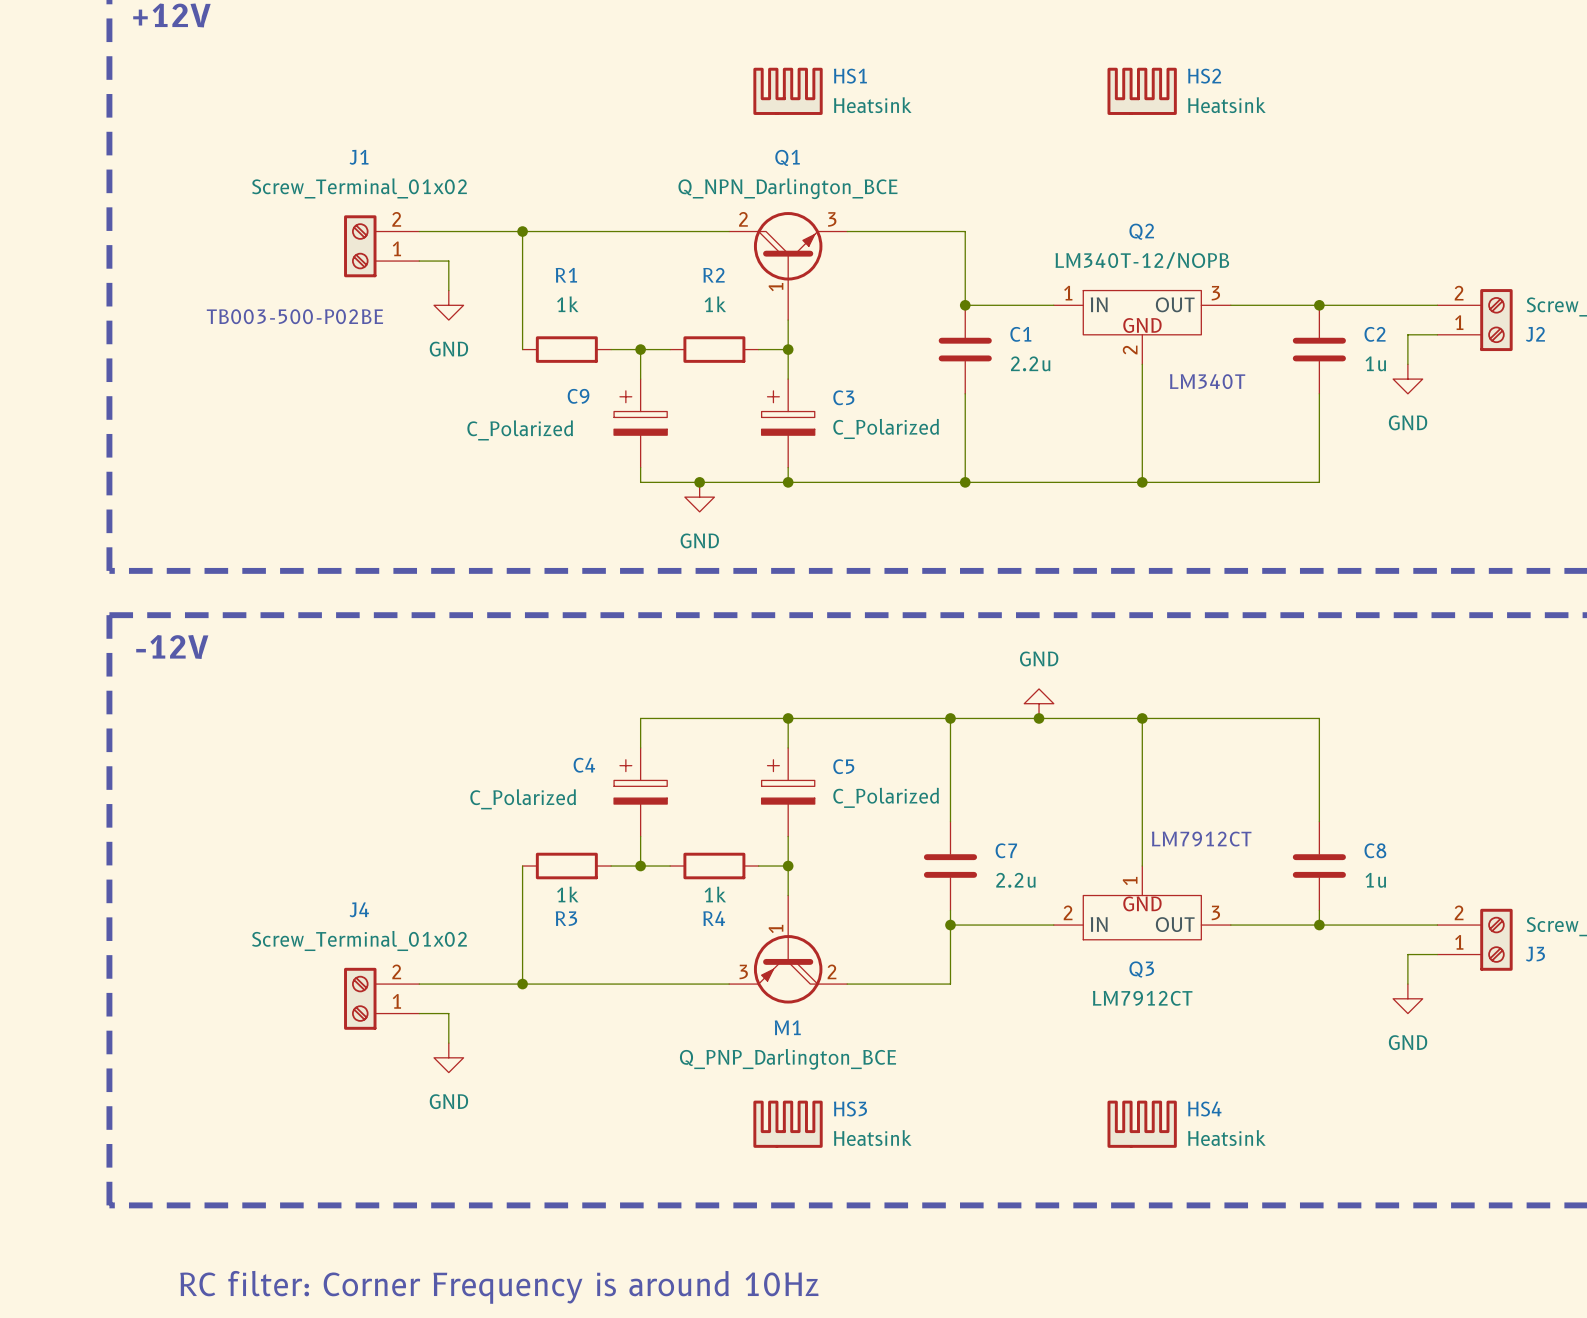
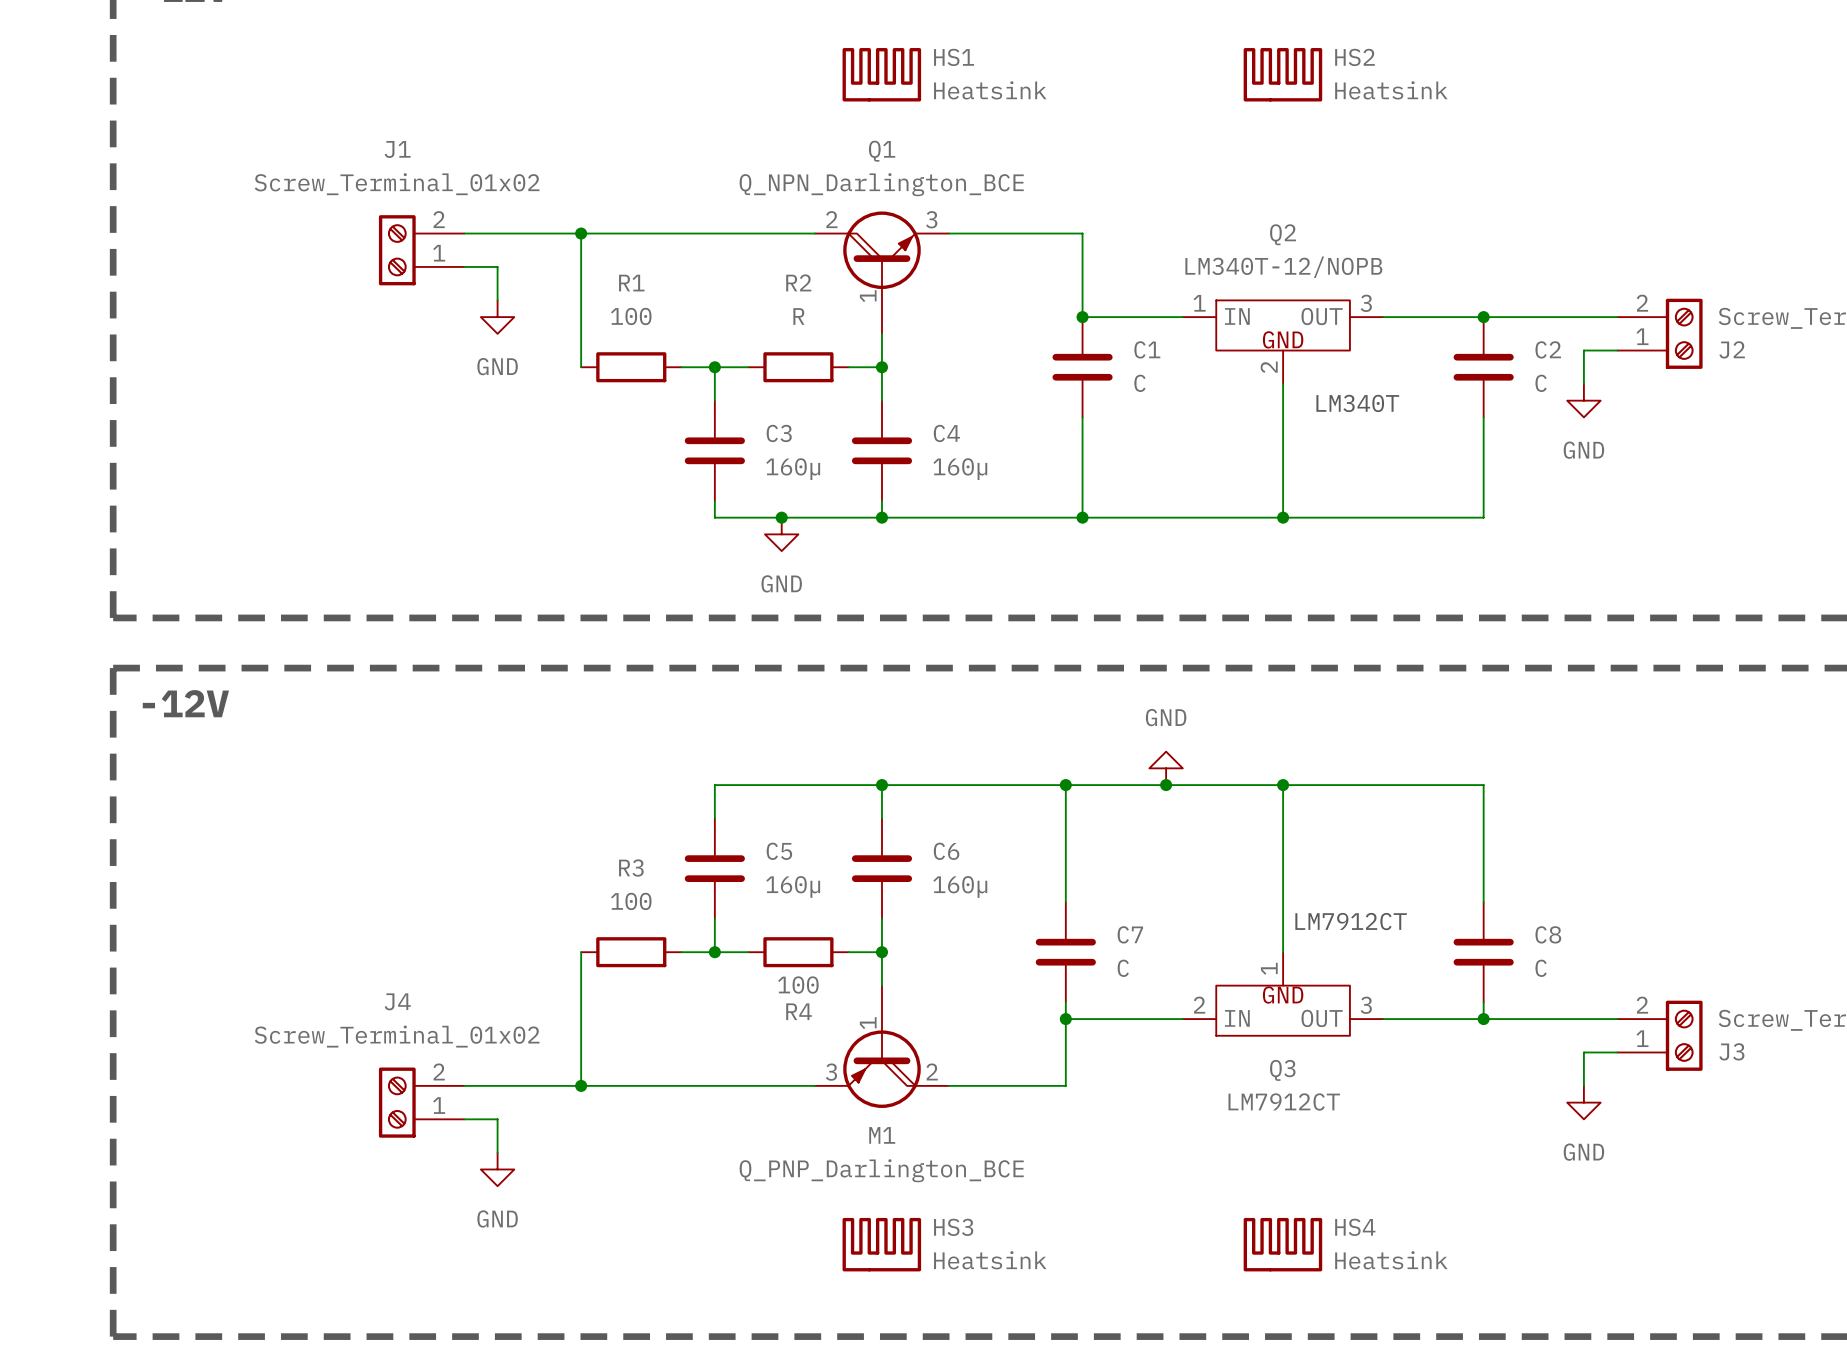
R1 value: 1k (567, 304) -> 100 (631, 316)
R2 value: 1k (715, 304) -> R (798, 316)
text: TB003-500-P02BE (294, 316) -> none
C1 value: 2.2u (1030, 363) -> C (1139, 383)
C2 value: 1u (1375, 363) -> C (1541, 383)
C3 symbol: [761, 379, 815, 468] -> [684, 400, 745, 501]
C9: C_Polarized (640, 423) -> none
C3 value: C_Polarized (886, 428) -> 160µ (793, 469)
C4 symbol: [614, 747, 668, 837] -> [851, 400, 913, 501]
C5 symbol: [761, 747, 815, 837] -> [684, 818, 745, 919]
C4 name position: C4 (584, 765) -> C4 (946, 433)
C6: none -> 160µ (881, 868)
C5 value: C_Polarized (886, 797) -> 160µ (793, 886)
C4 value: C_Polarized (523, 799) -> 160µ (960, 469)
C7 value: 2.2u (1015, 880) -> C (1123, 968)
C8 value: 1u (1375, 880) -> C (1541, 968)
R3 value: 1k (567, 894) -> 100 (631, 901)
R4 value: 1k (715, 894) -> 100 (798, 985)
R3 name position: R3 (566, 918) -> R3 (631, 868)

